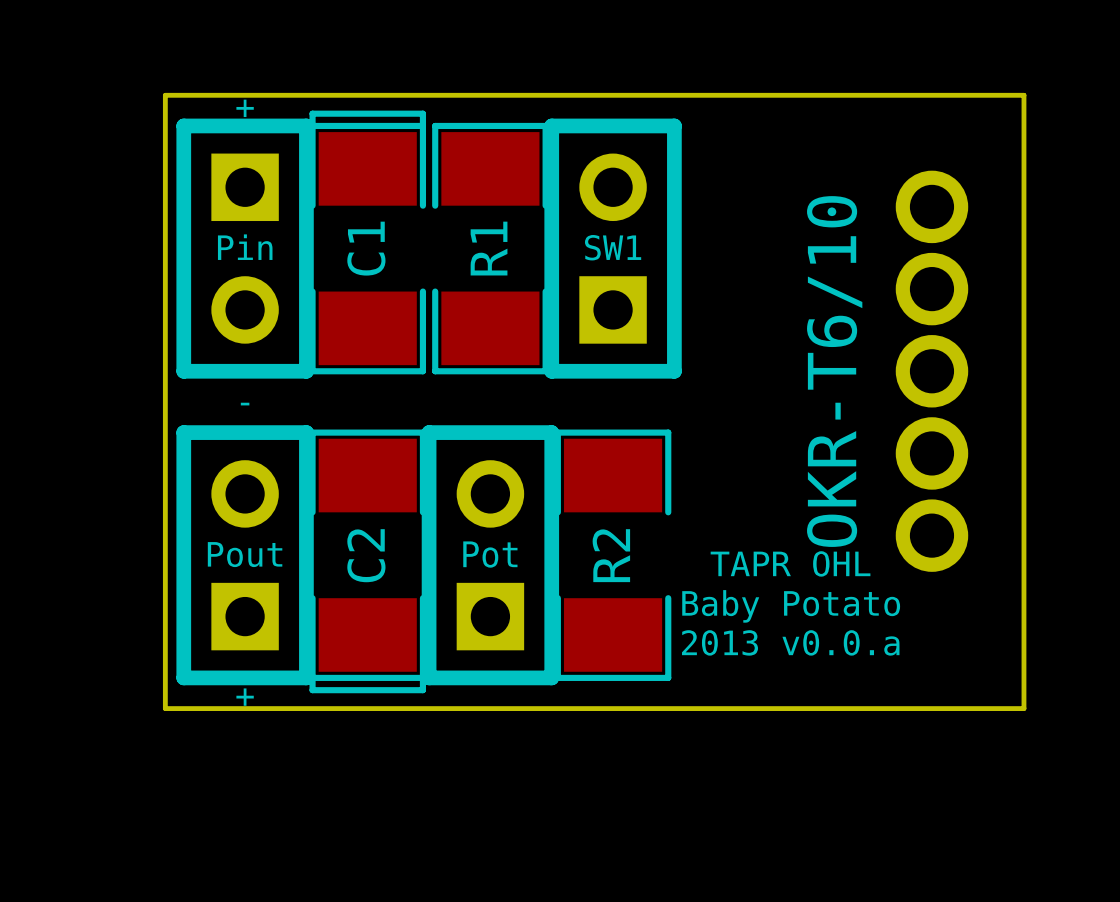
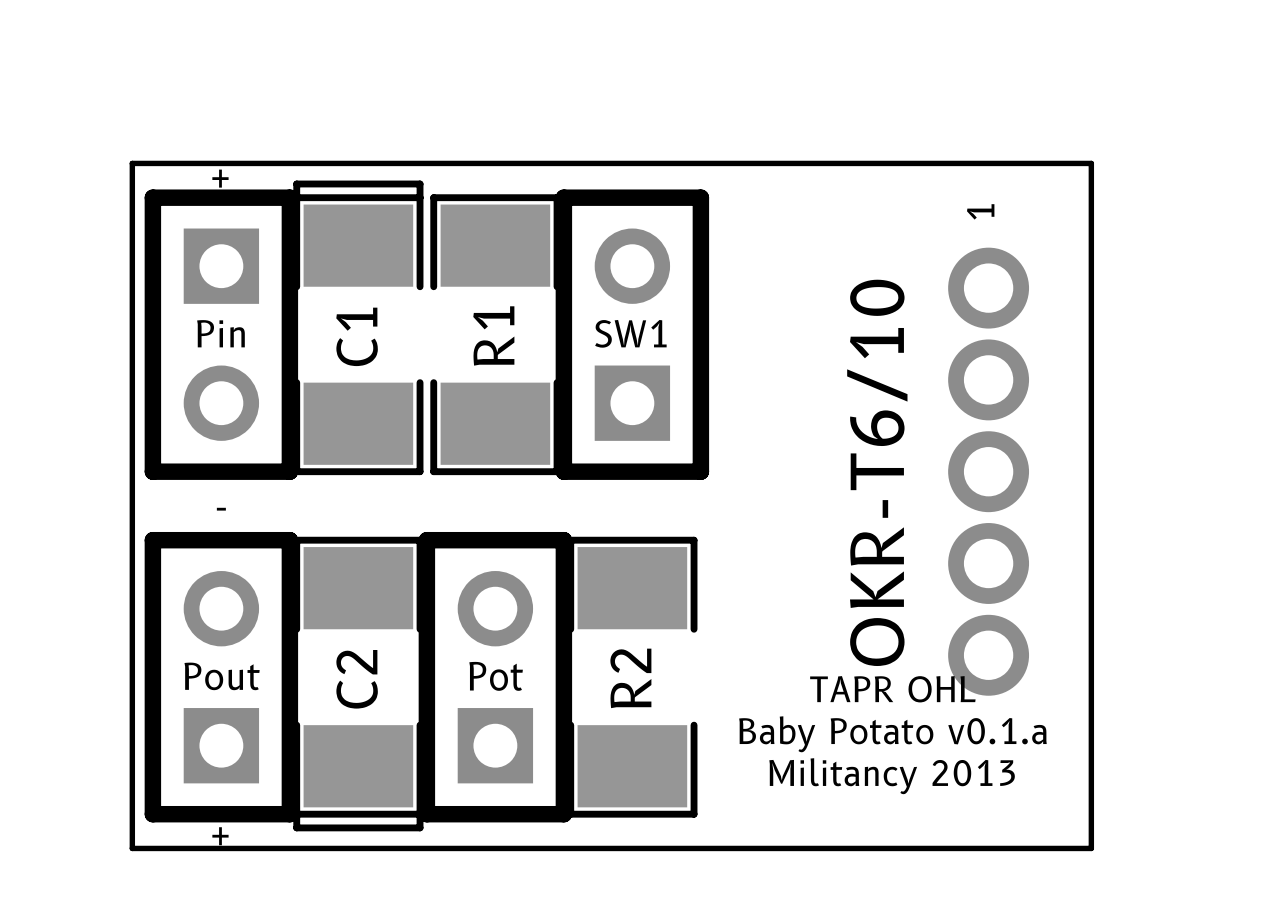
text: none -> 1 (980, 211)
text position: TAPR OHL (790, 563) -> TAPR OHL (892, 689)
text: Baby Potato (791, 606) -> Baby Potato v0.1.a (892, 734)
text: 2013 v0.0.a (790, 642) -> none
text: none -> Militancy 2013 (892, 776)

